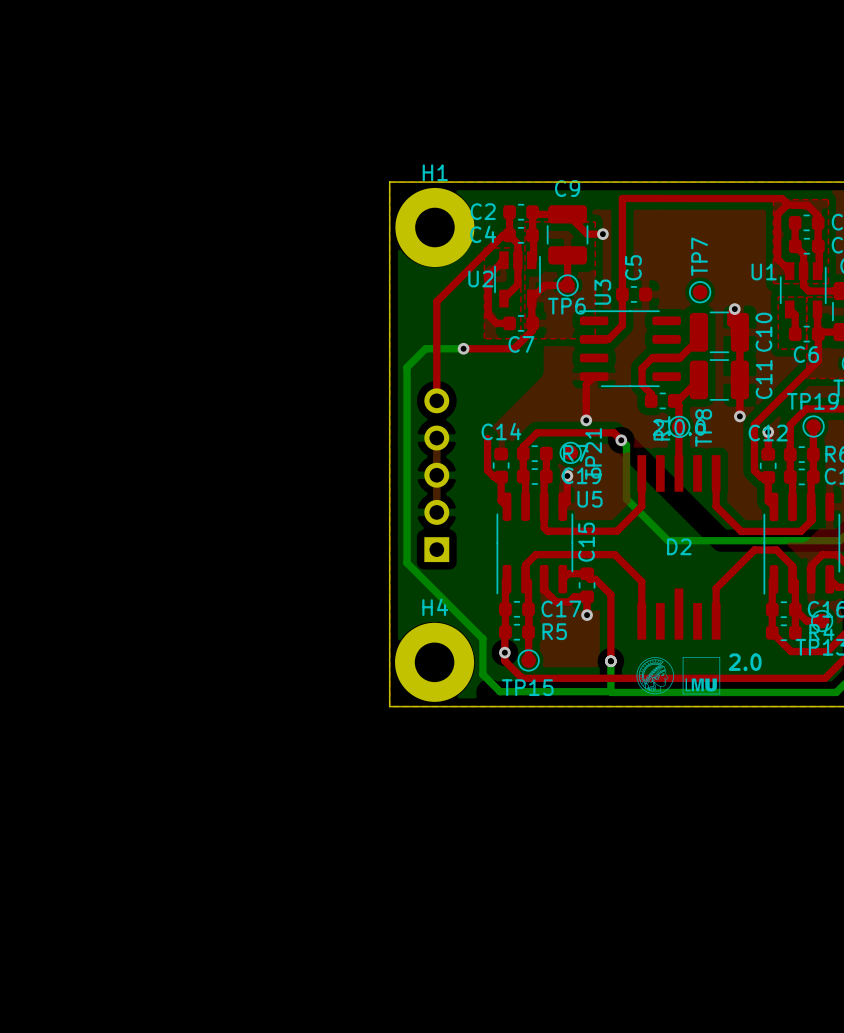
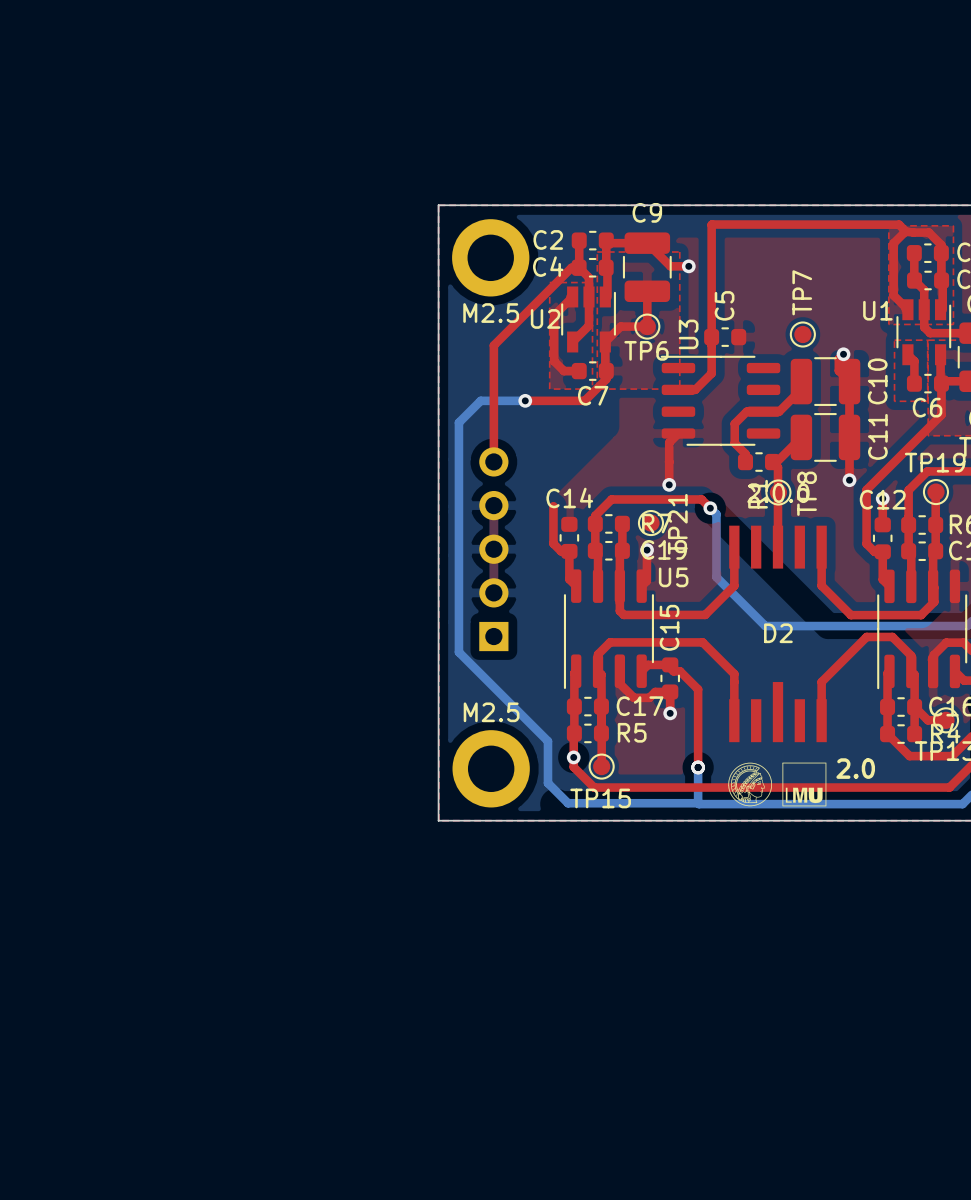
M2.5: none -> (490, 257)
H1: (434, 227) -> none
H4: (434, 662) -> none
M2.5: none -> (491, 768)

